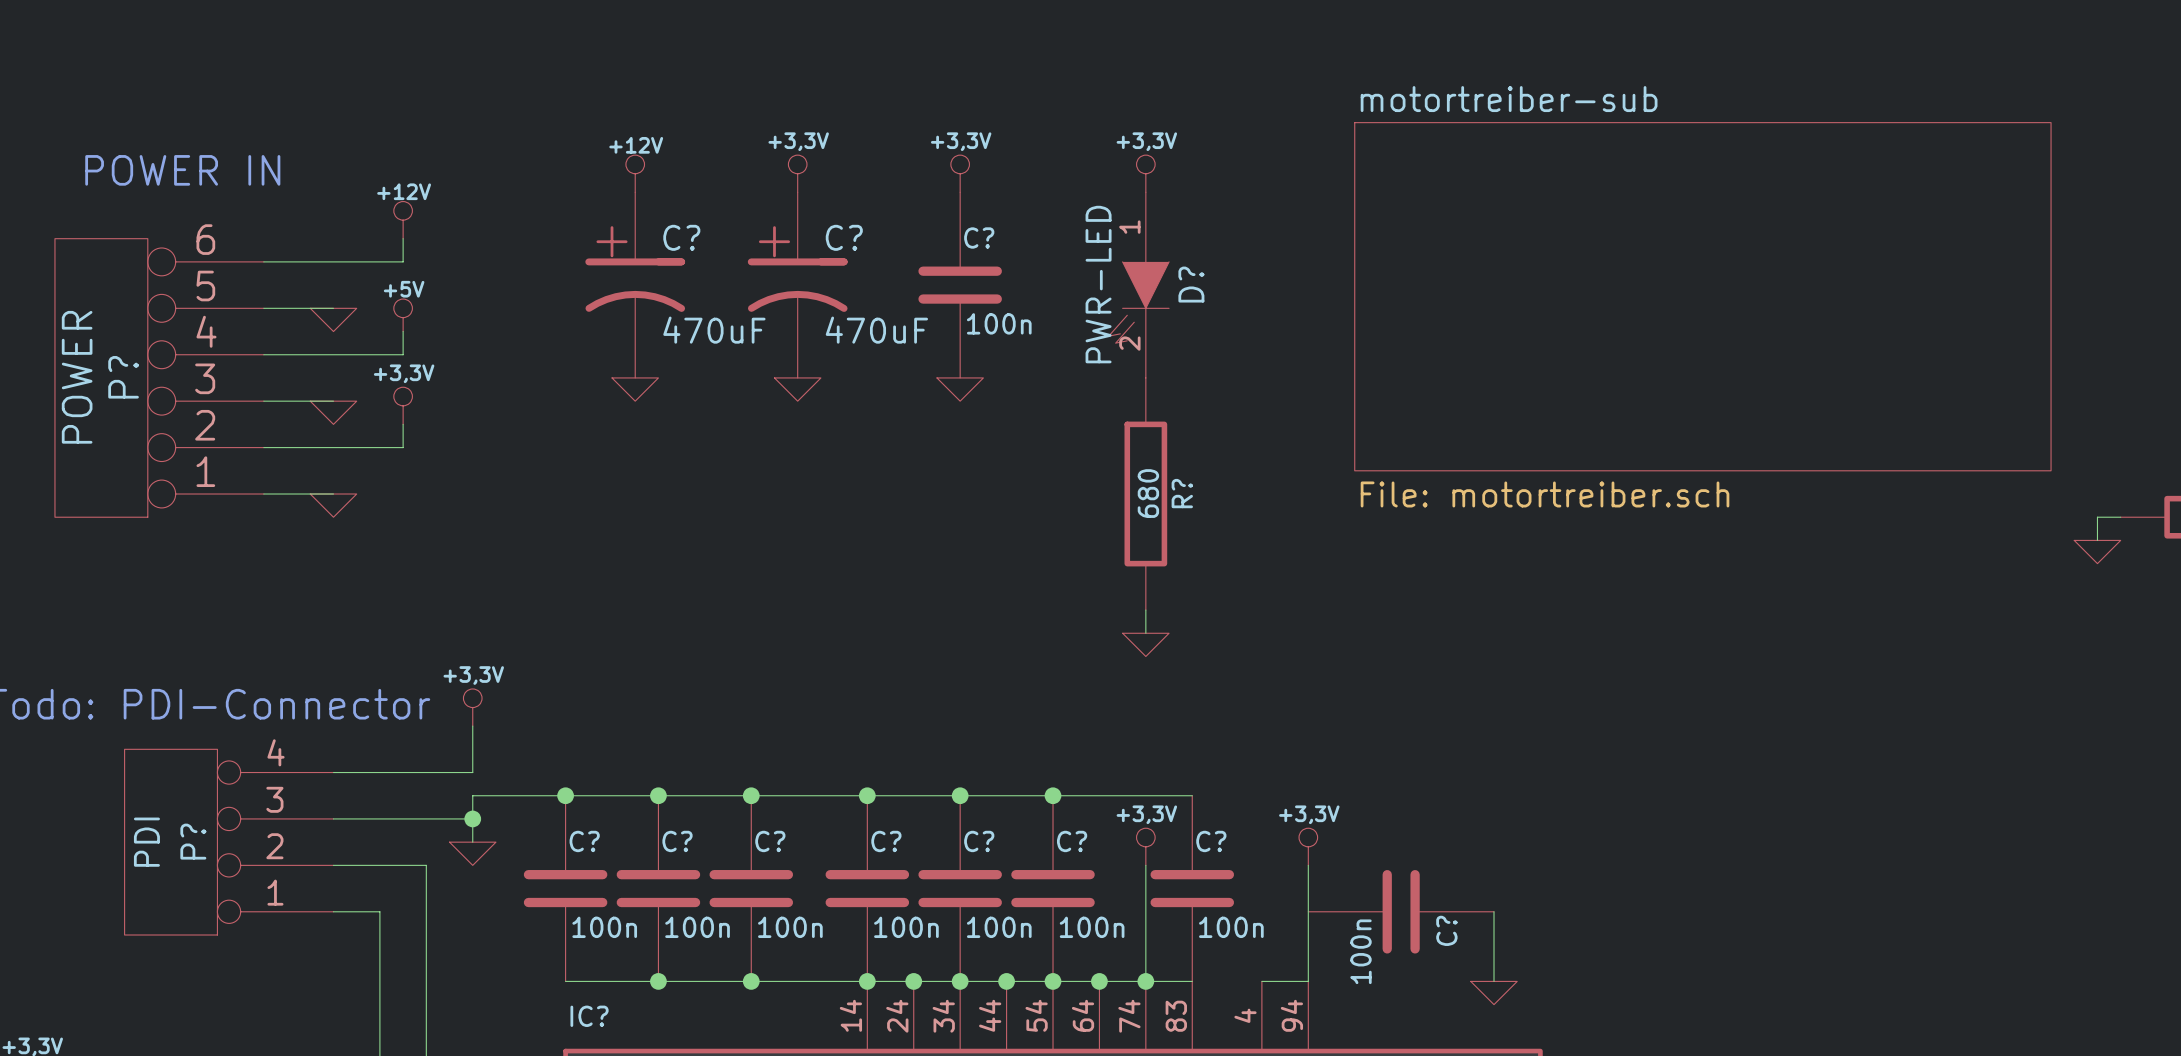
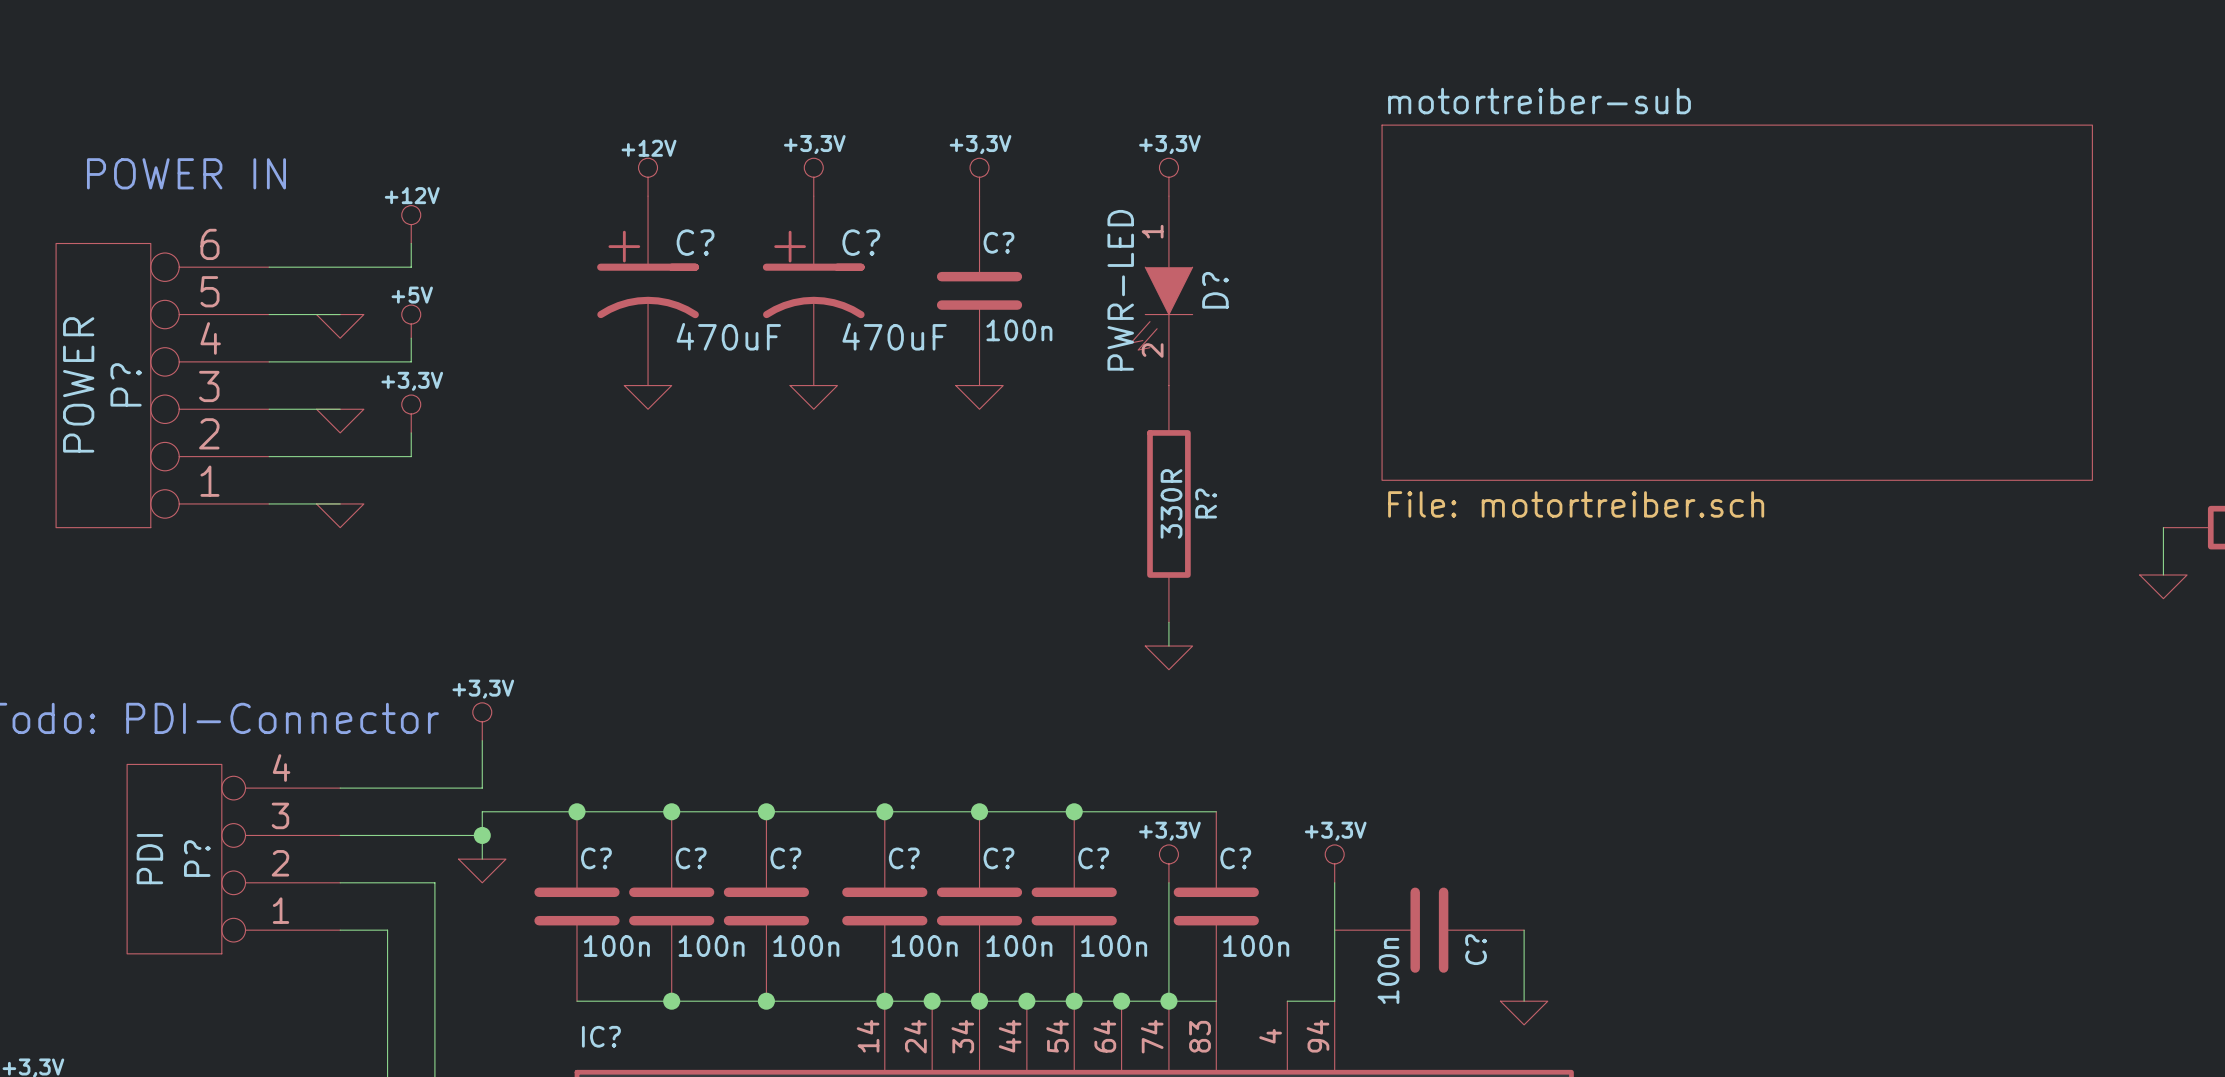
R? value: 680 (1148, 493) -> 330R (1171, 503)
wire: (2120, 517) (2097, 517) (2097, 540) -> (2163, 527) (2163, 575)
power symbol position: (2097, 552) -> (2163, 586)

